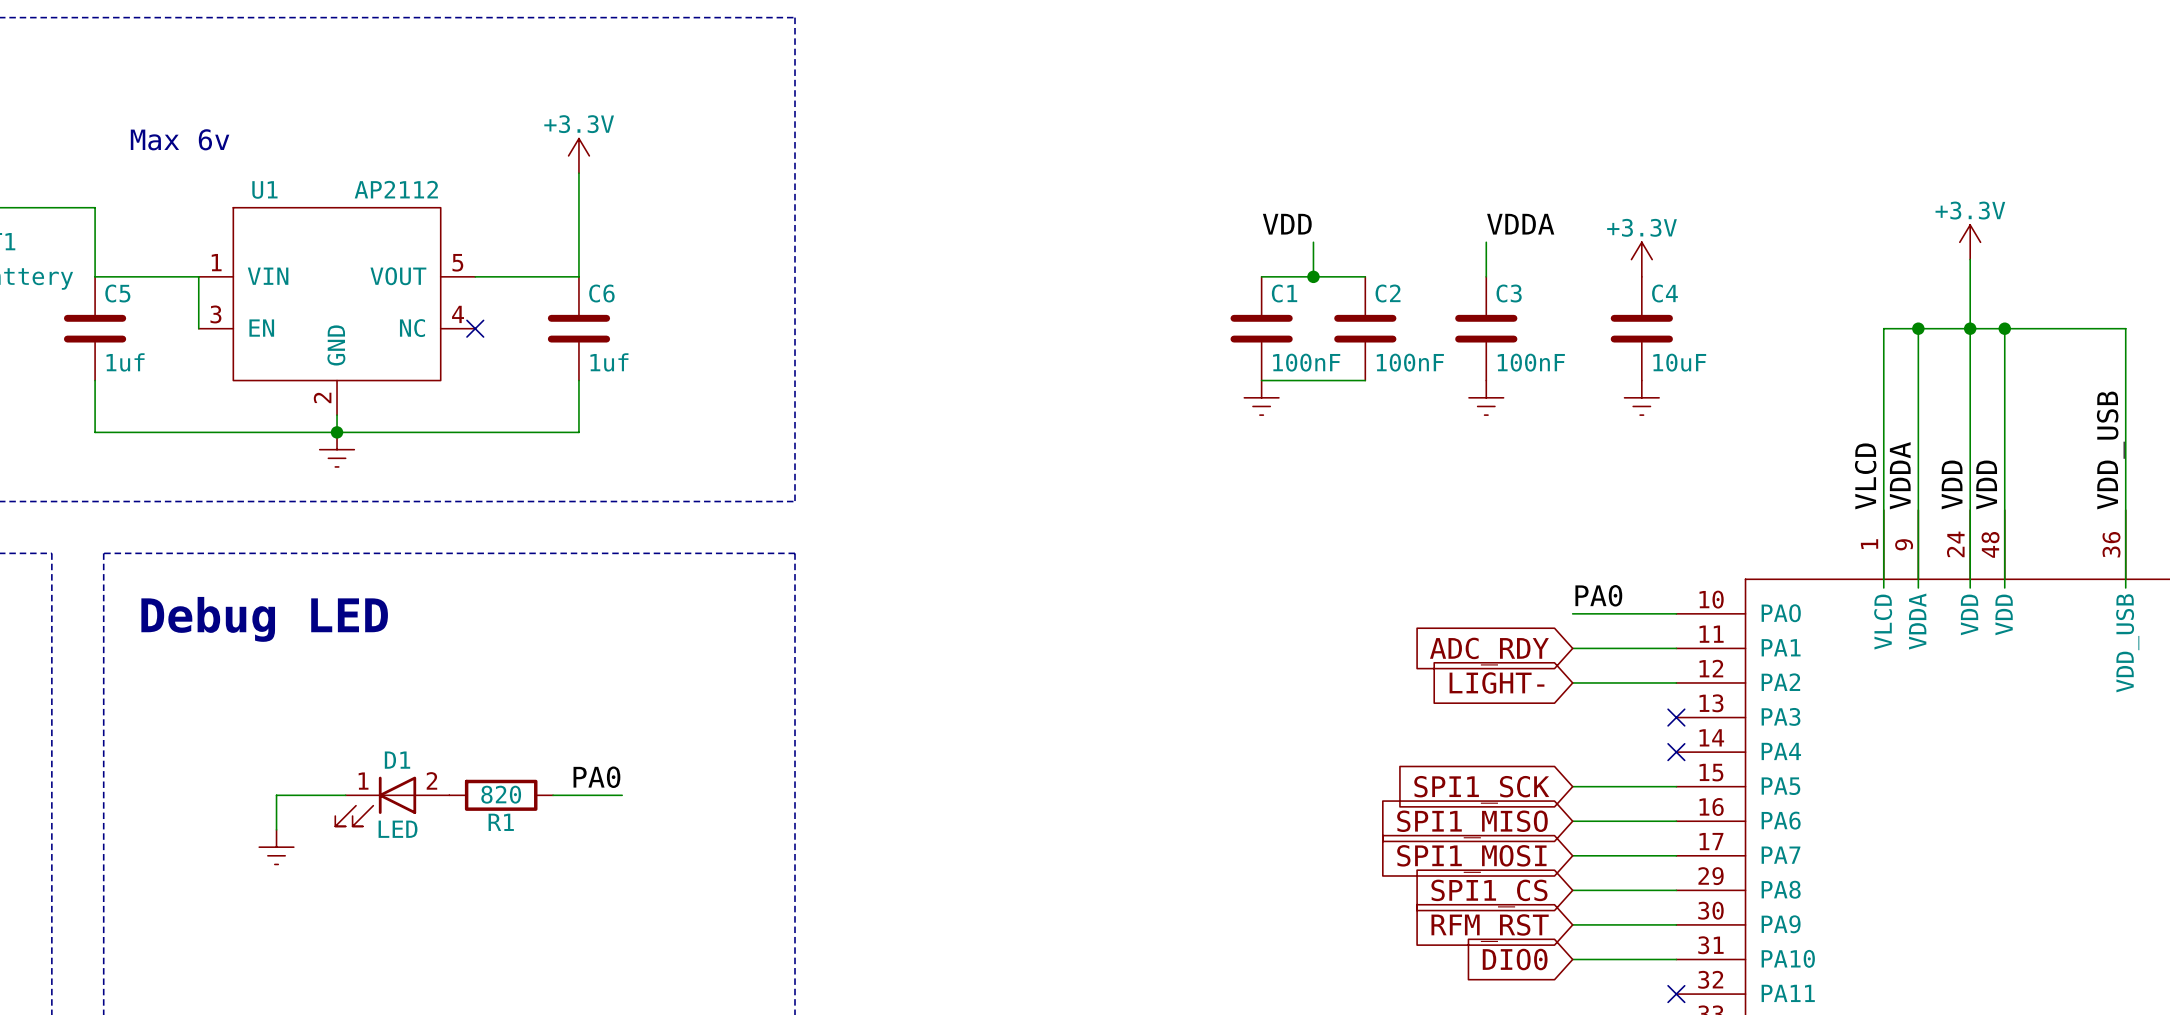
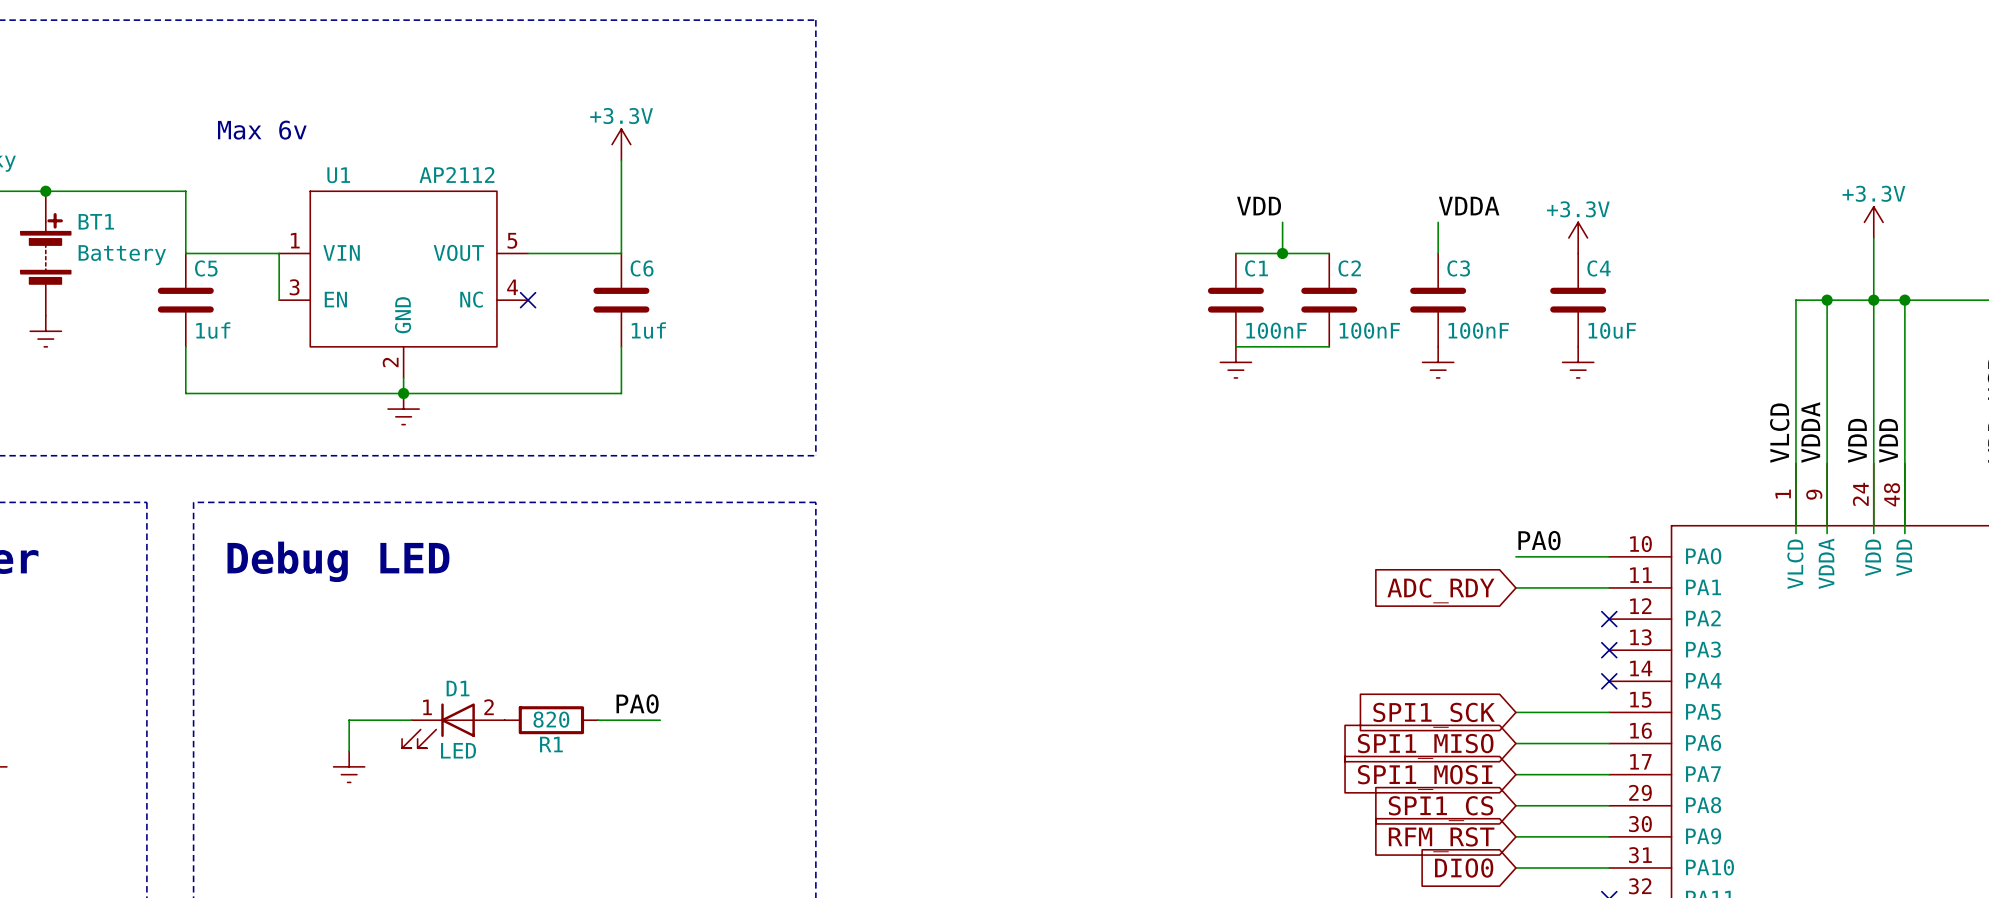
wire: (1572, 682) (1676, 682) -> none
no-connect mark: none -> (1609, 619)
global label: LIGHT- (1497, 683) -> none

